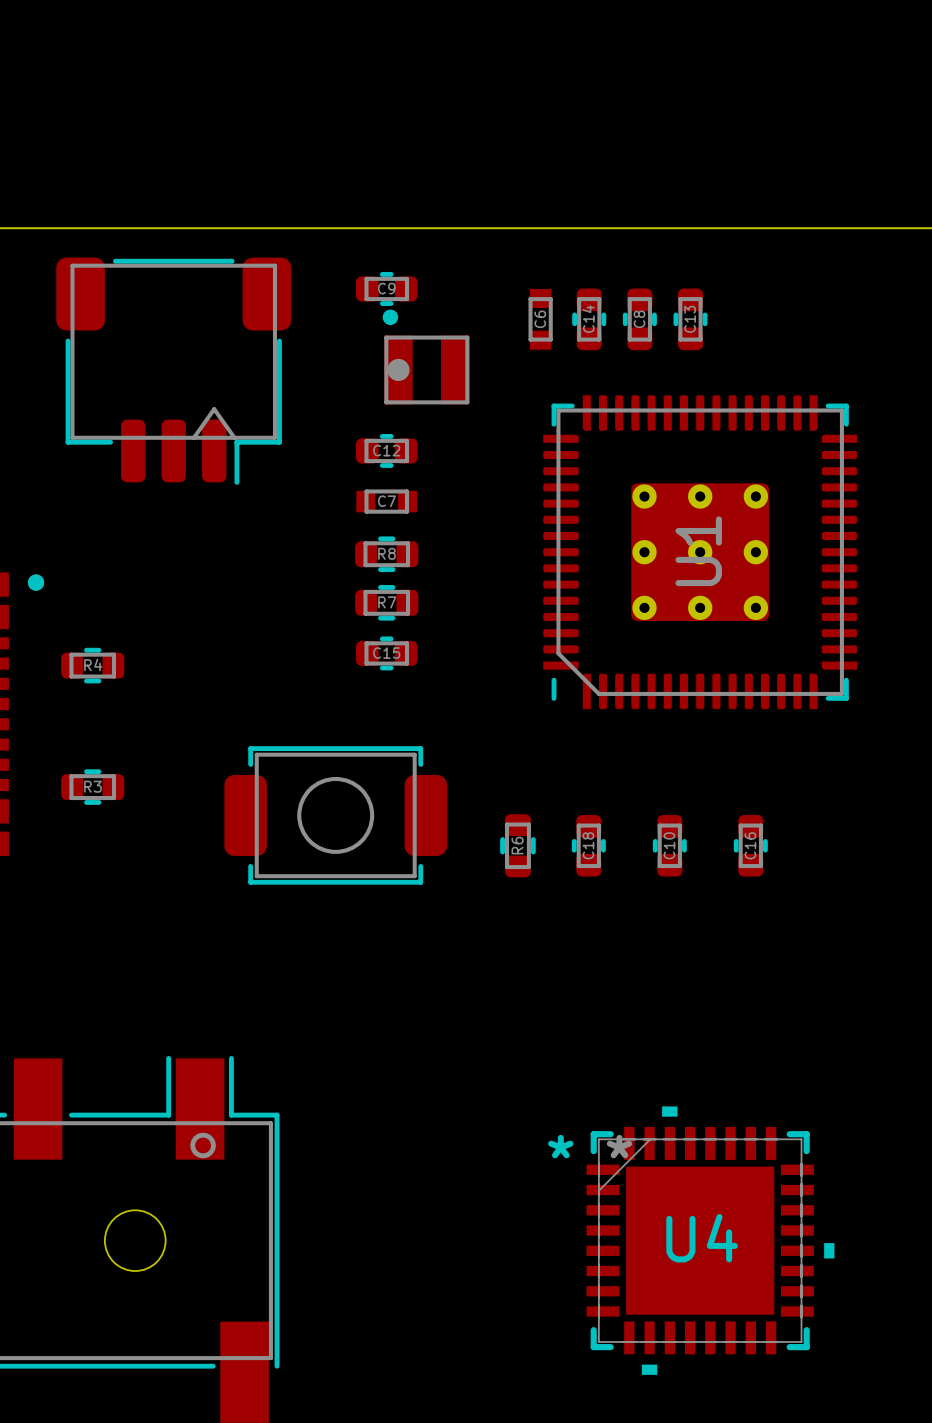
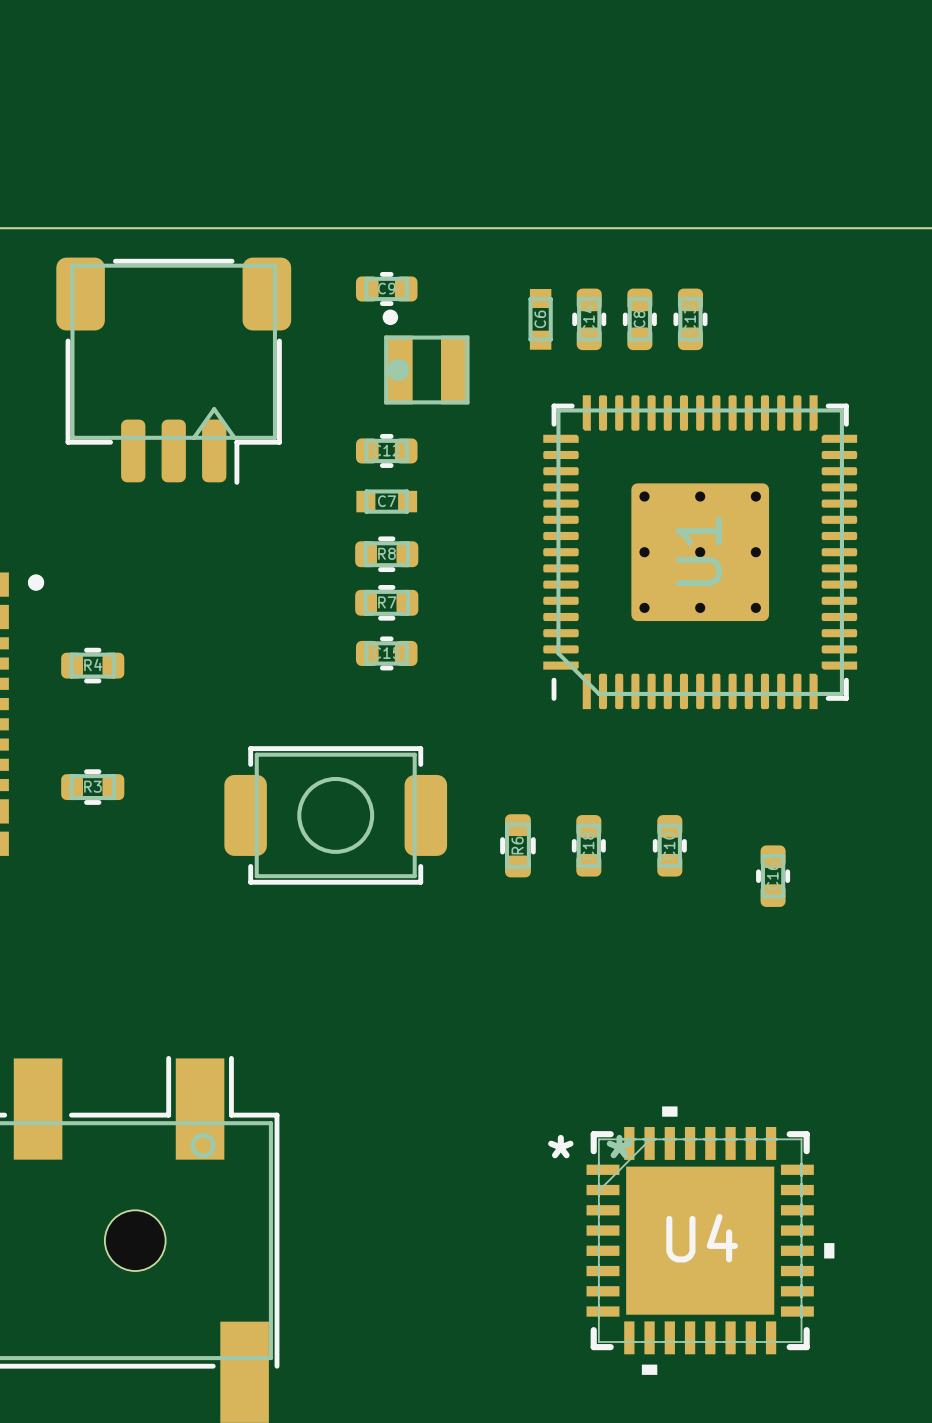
C16 position: (750, 845) -> (773, 876)

